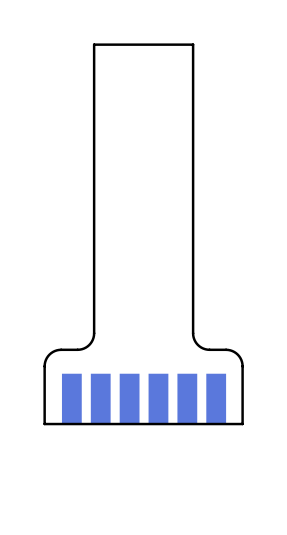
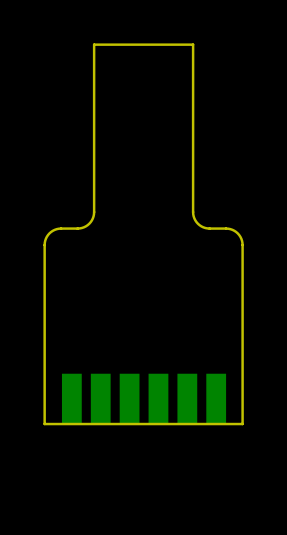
board edge: (94, 212) (93, 337) (89, 344) (83, 348) (52, 352) (46, 358) (44, 366) -> (94, 212) (91, 220) (85, 226) (54, 229) (49, 233) (45, 240) (44, 366)
board edge: (193, 212) (193, 337) (197, 344) (203, 348) (234, 352) (240, 358) (242, 366) -> (193, 212) (195, 220) (201, 226) (232, 229) (237, 233) (242, 240) (242, 366)

